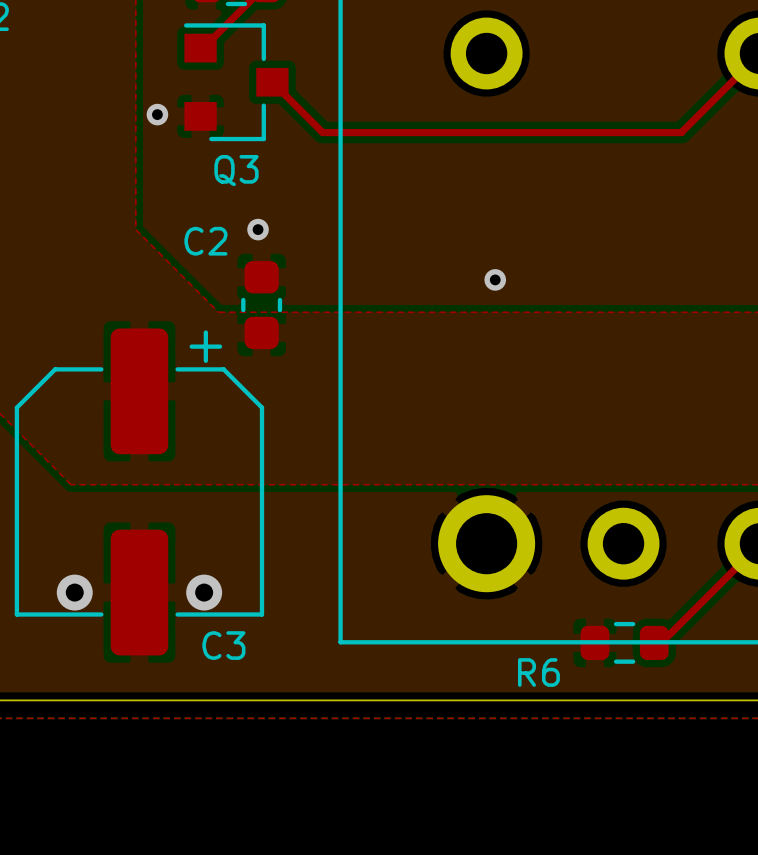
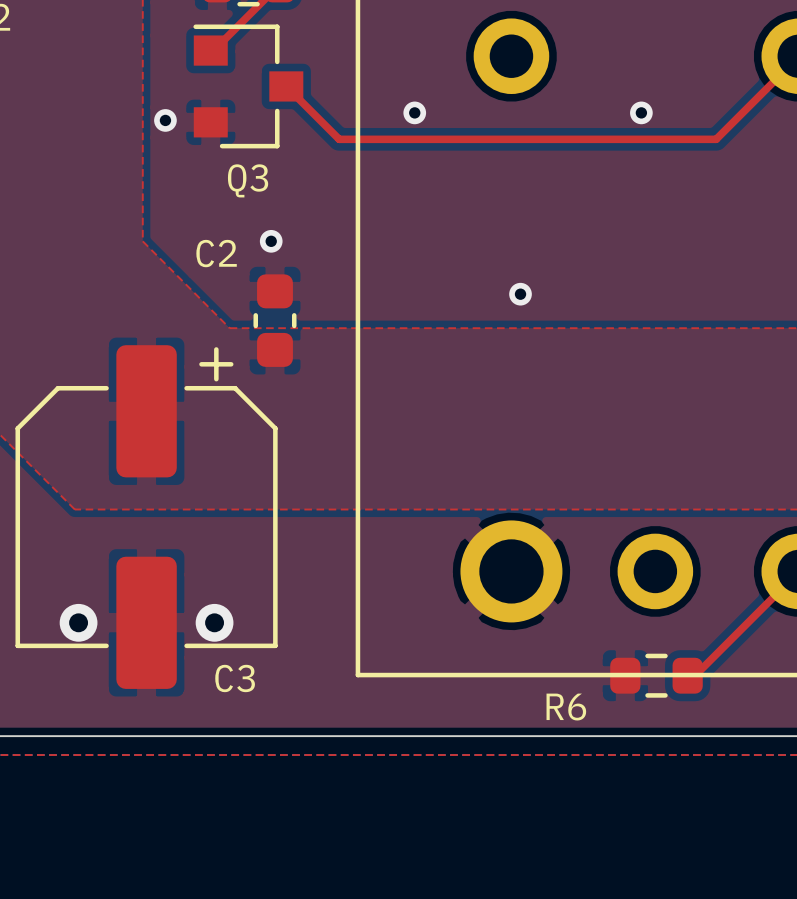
via: none -> (414, 112)
via: none -> (641, 112)

